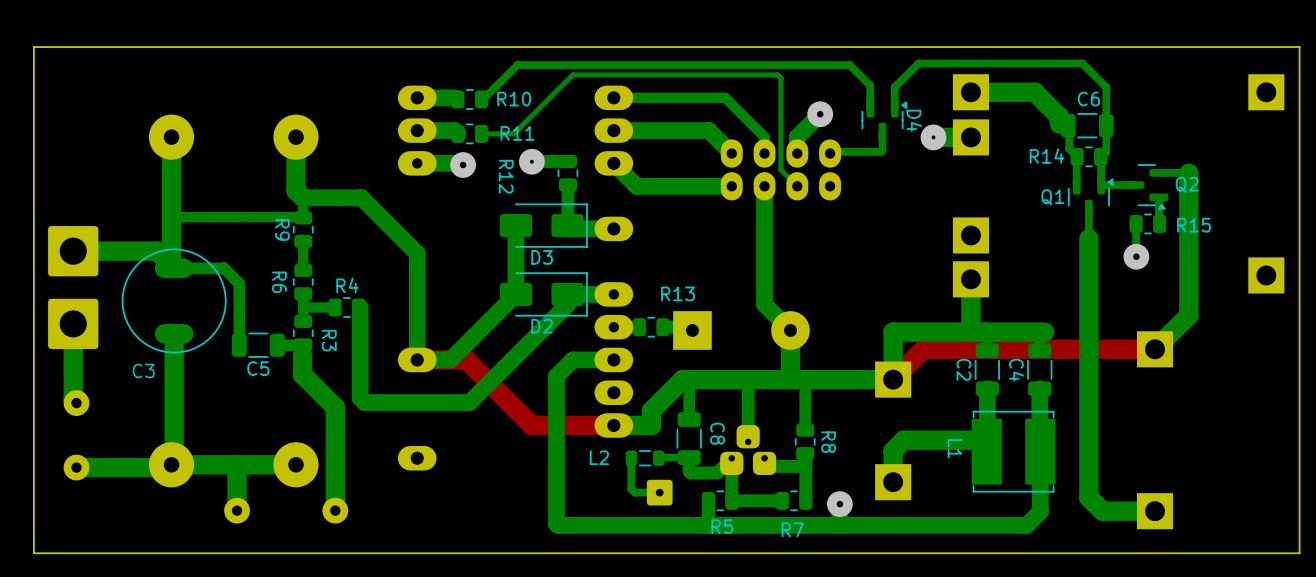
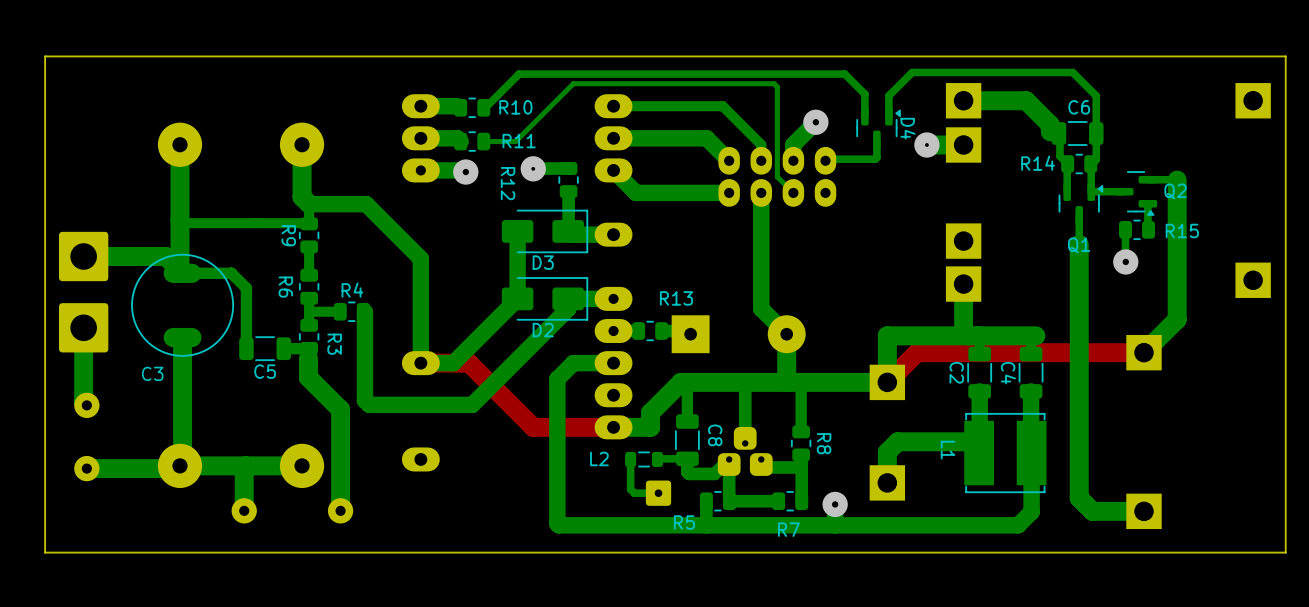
Q1 name position: Q1 (1052, 197) -> Q1 (1079, 245)
R5 name position: R5 (722, 526) -> R5 (684, 522)

